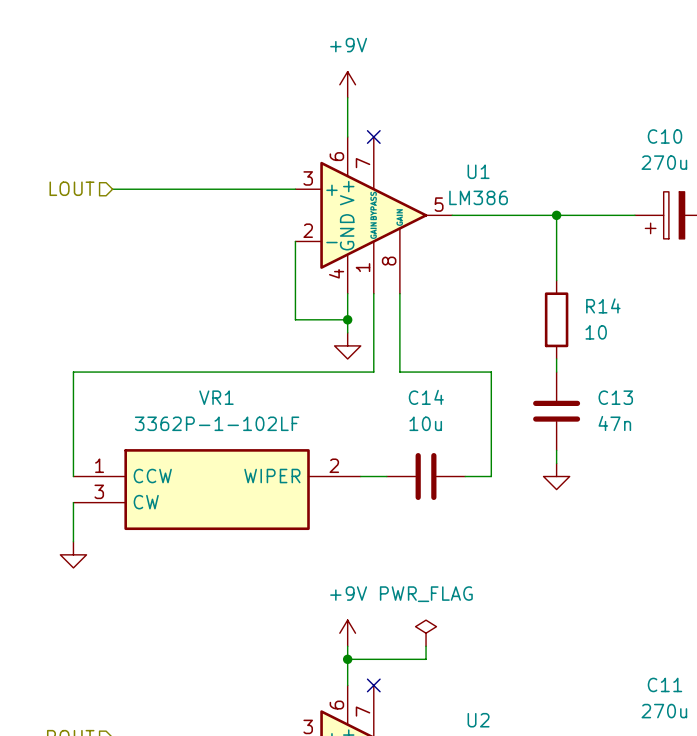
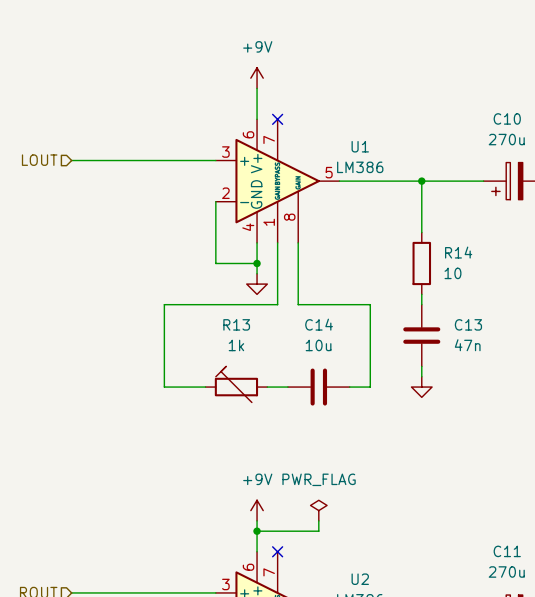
wire: (230, 372) (73, 372) (73, 476) -> (164, 304) (164, 387) (205, 387)
R13: none -> 1k (236, 384)
VR1: 3362P-1-102LF (217, 489) -> none
wire: (73, 502) (73, 541) -> none
power symbol: (73, 554) -> none

